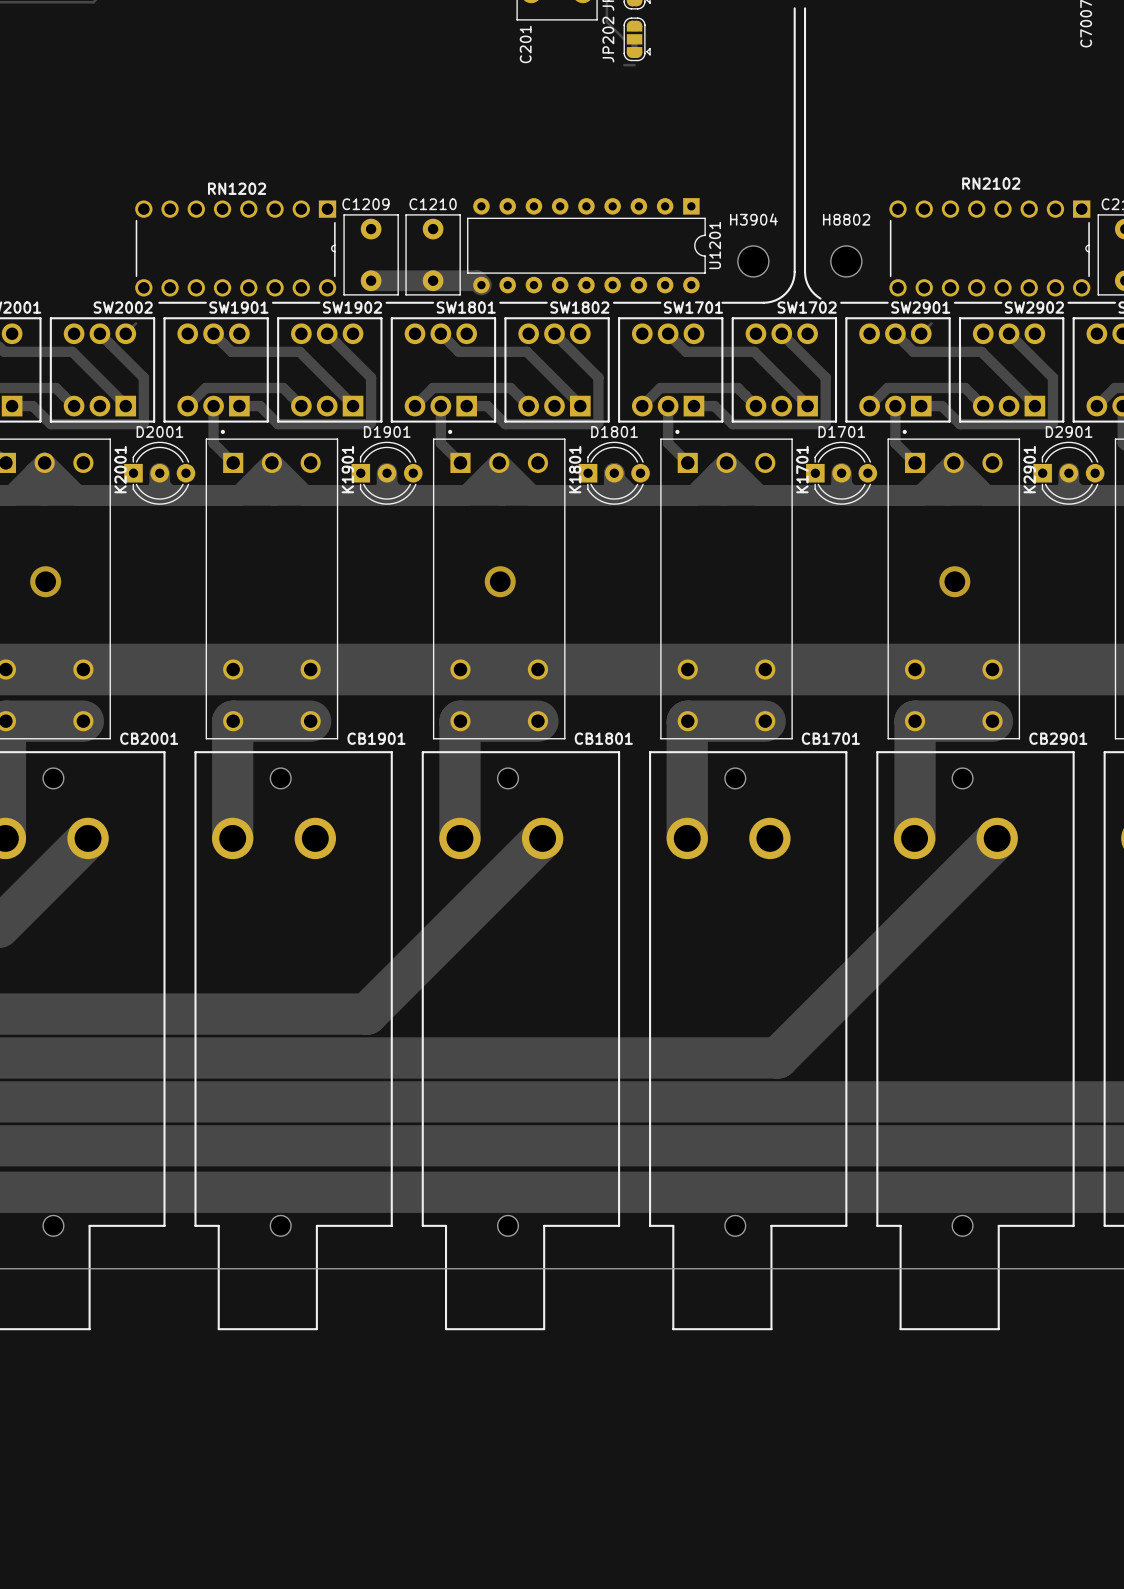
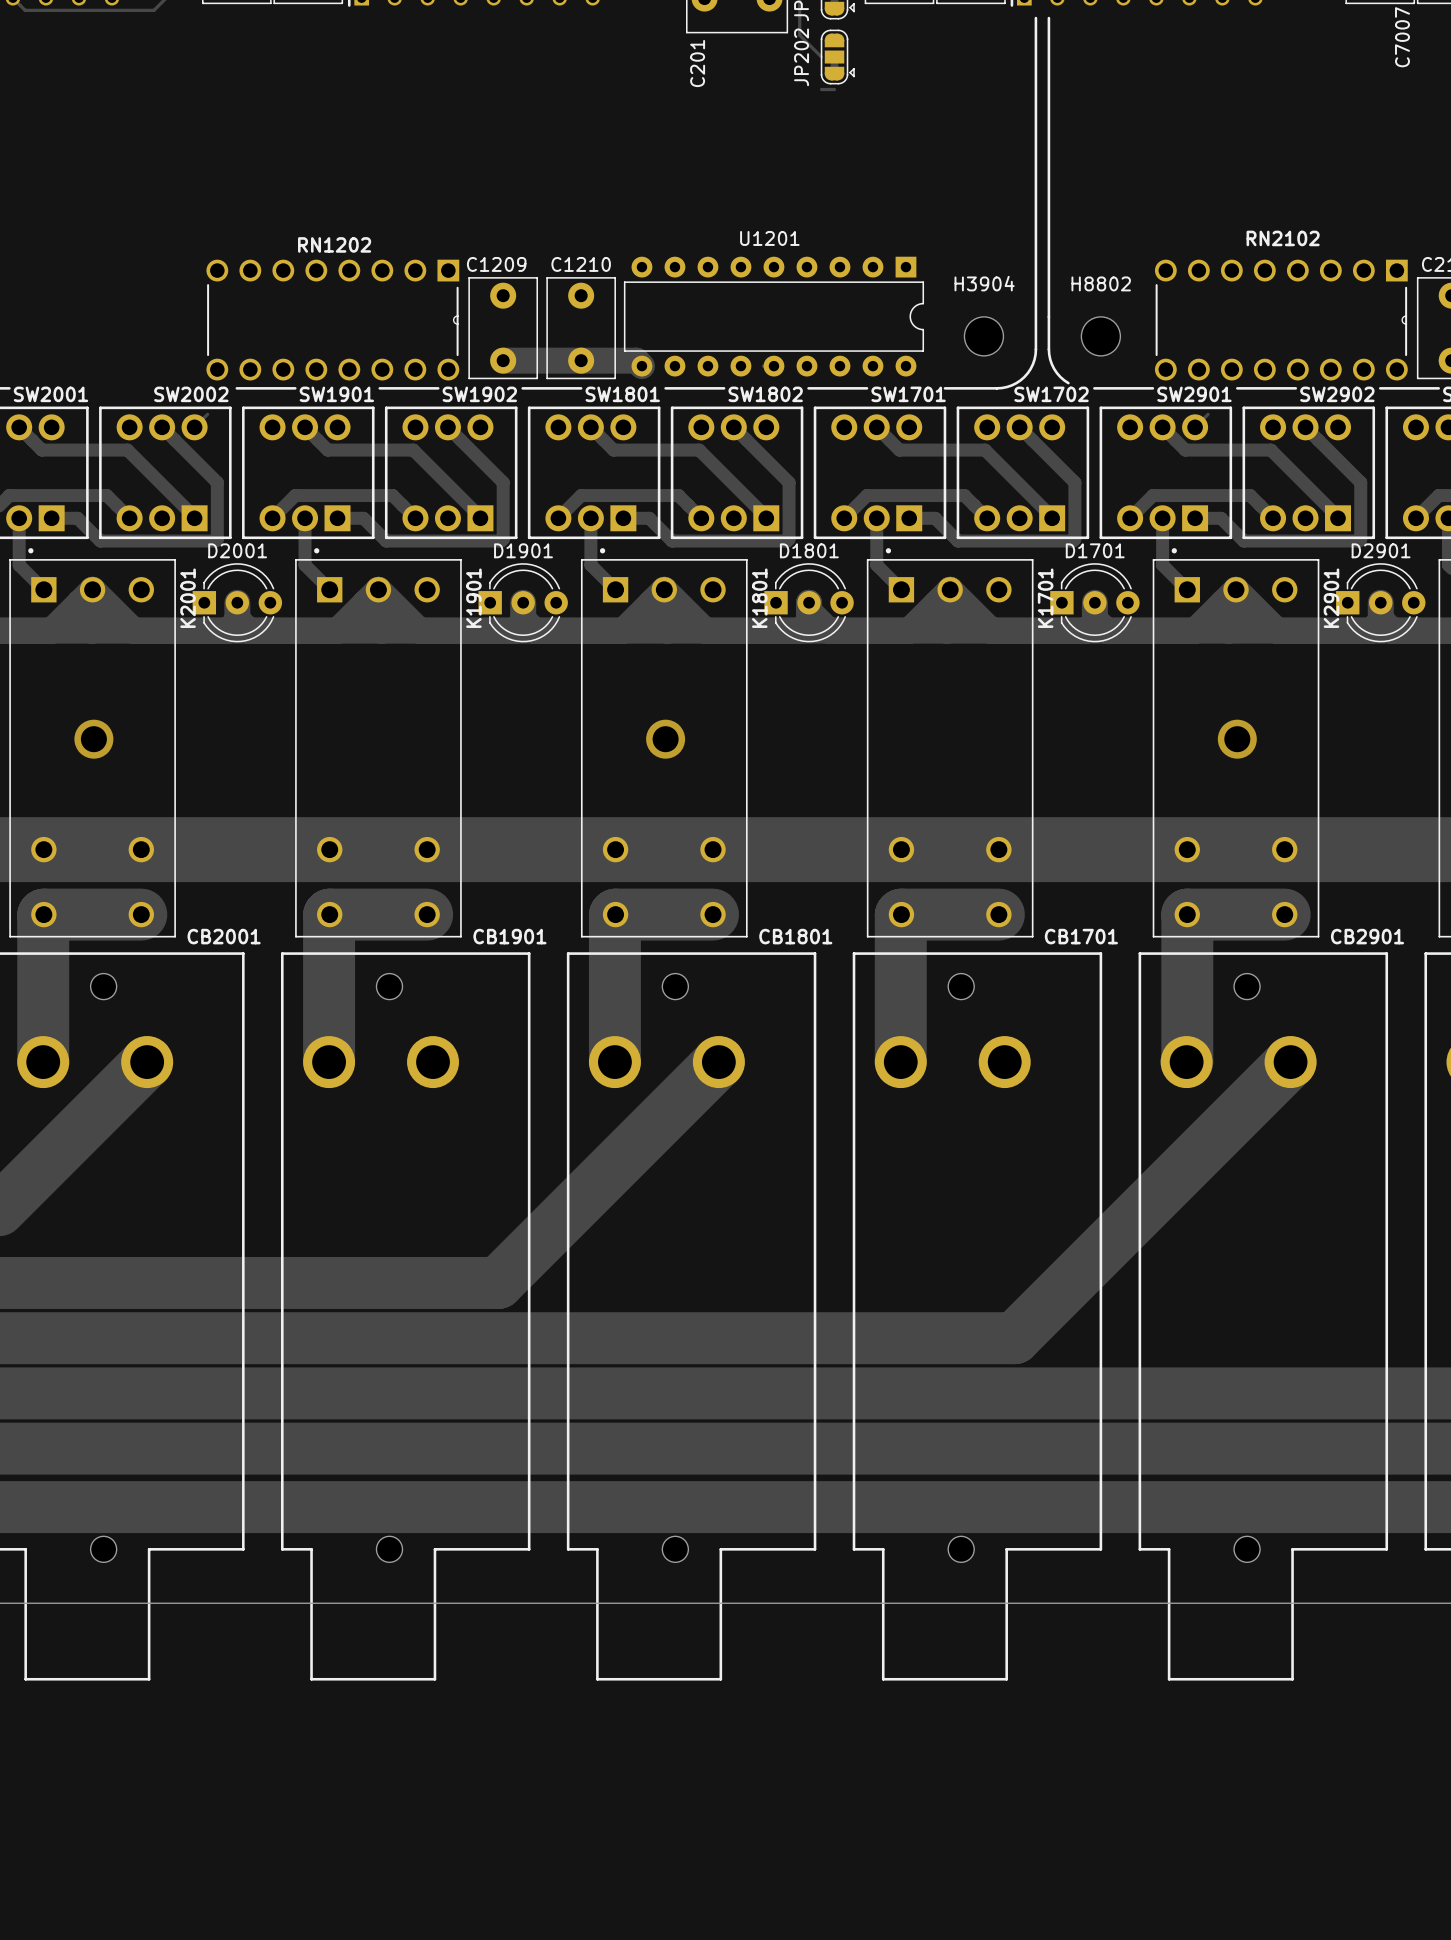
U1201 name rotation: 0° (715, 245) -> 90° clockwise (769, 238)
U1201 name position: U1201 (715, 245) -> U1201 (769, 238)

